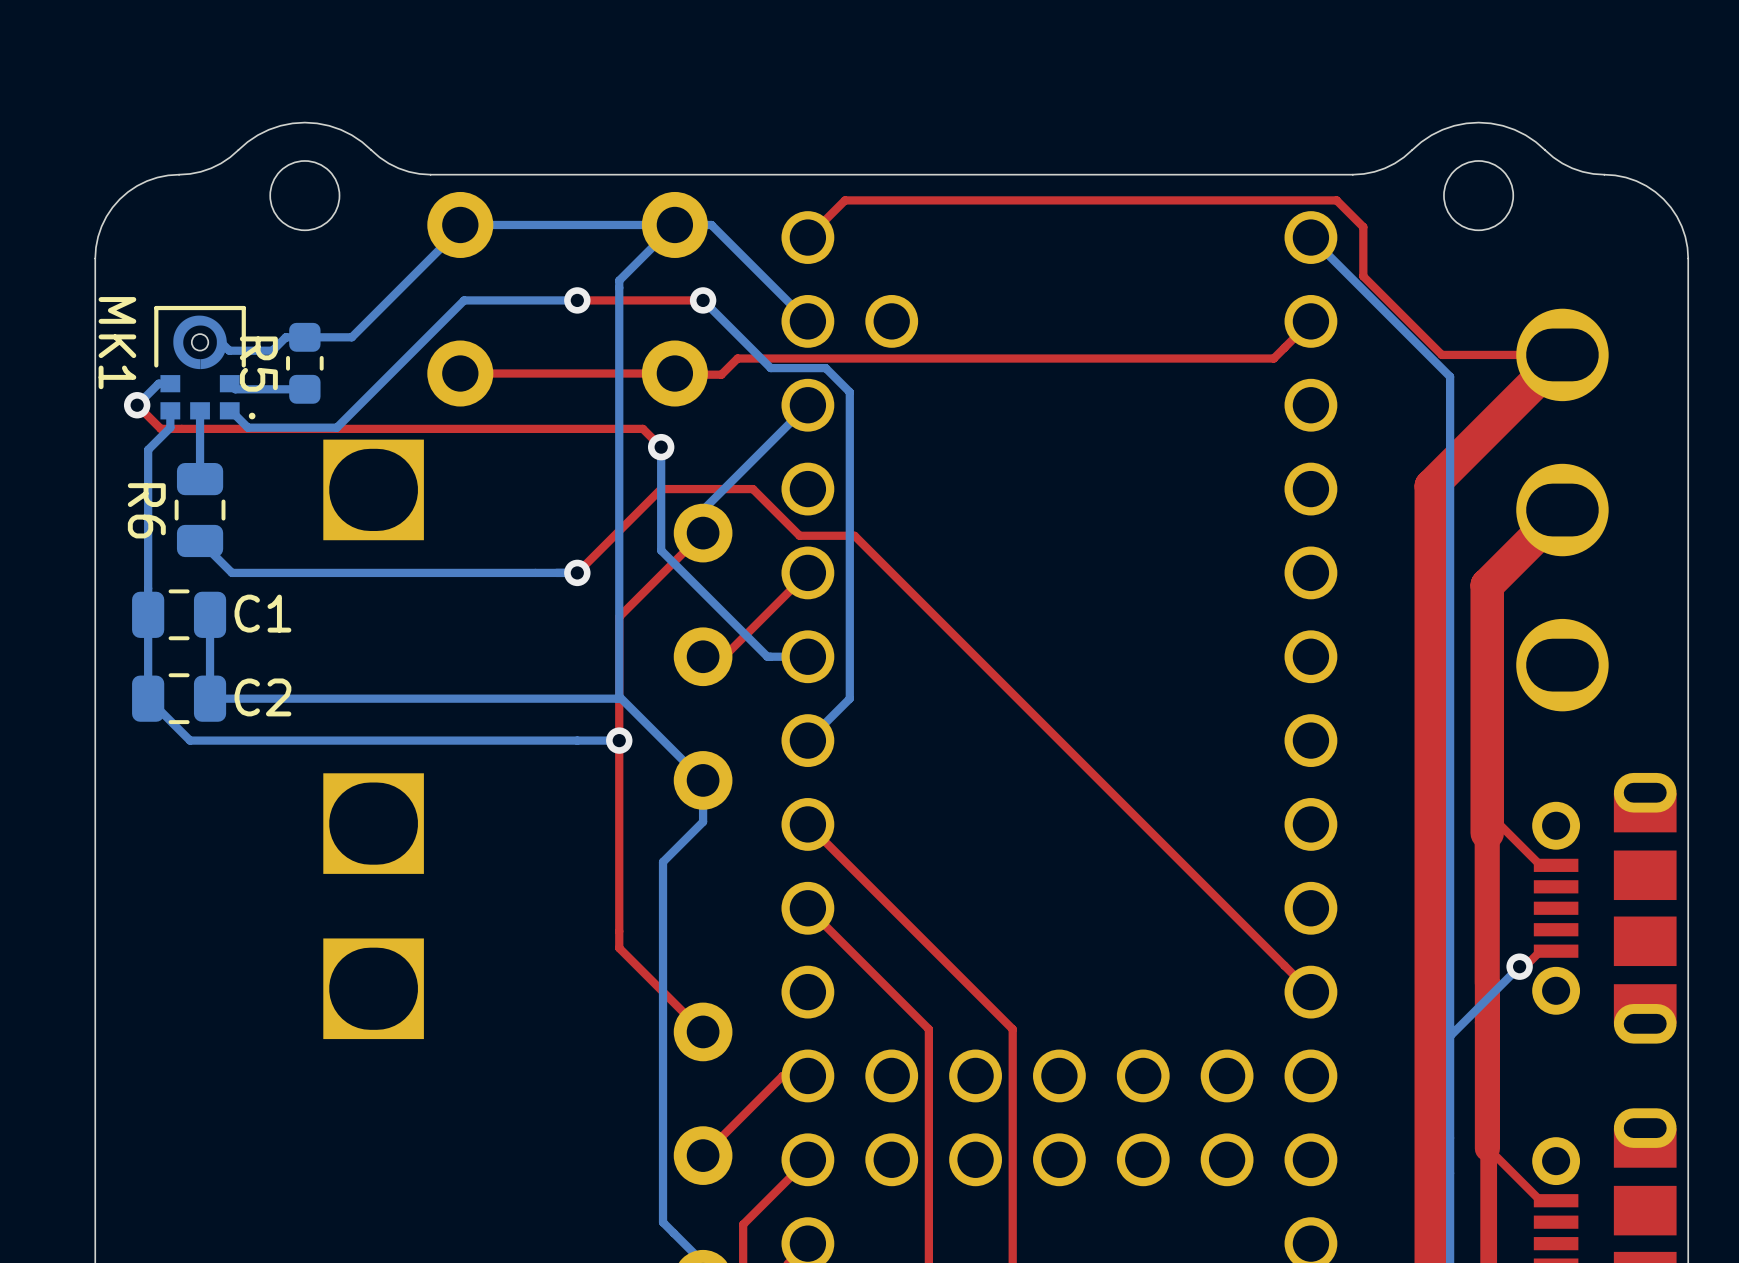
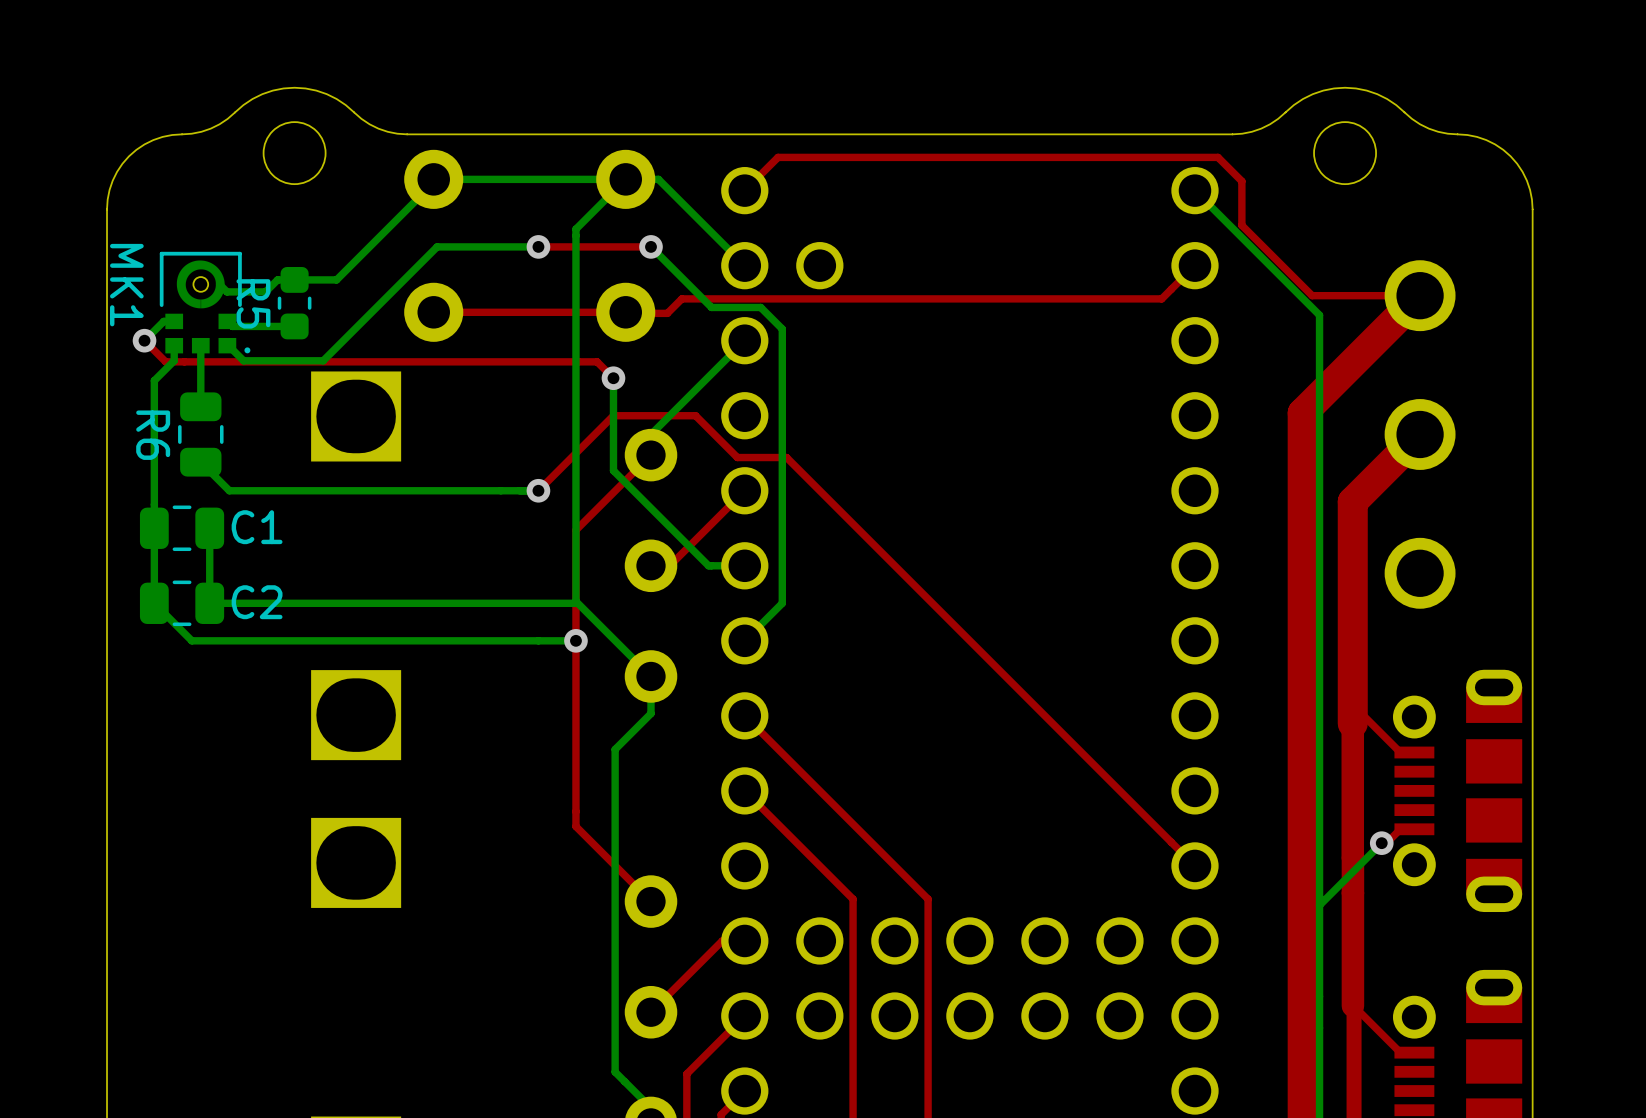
part footprint: [1516, 308, 1609, 712] -> [1384, 260, 1456, 609]

